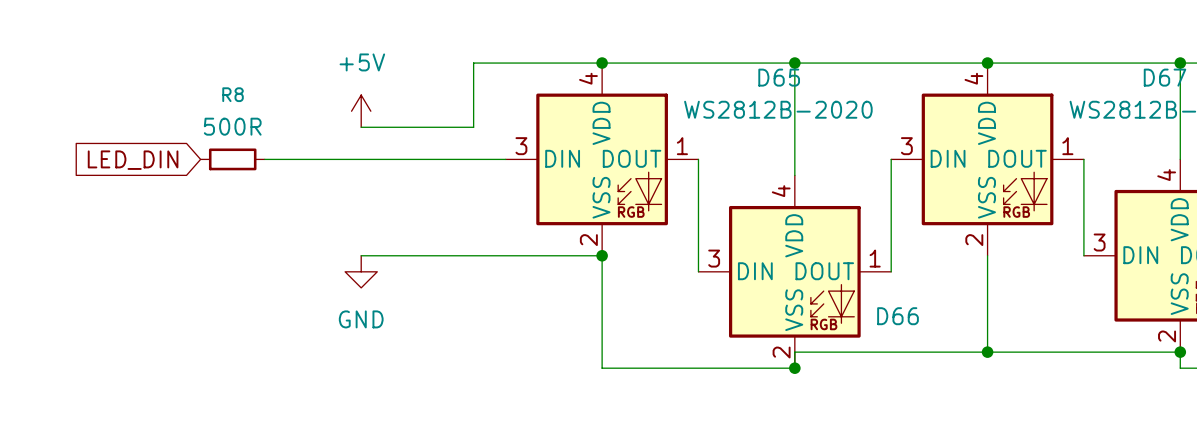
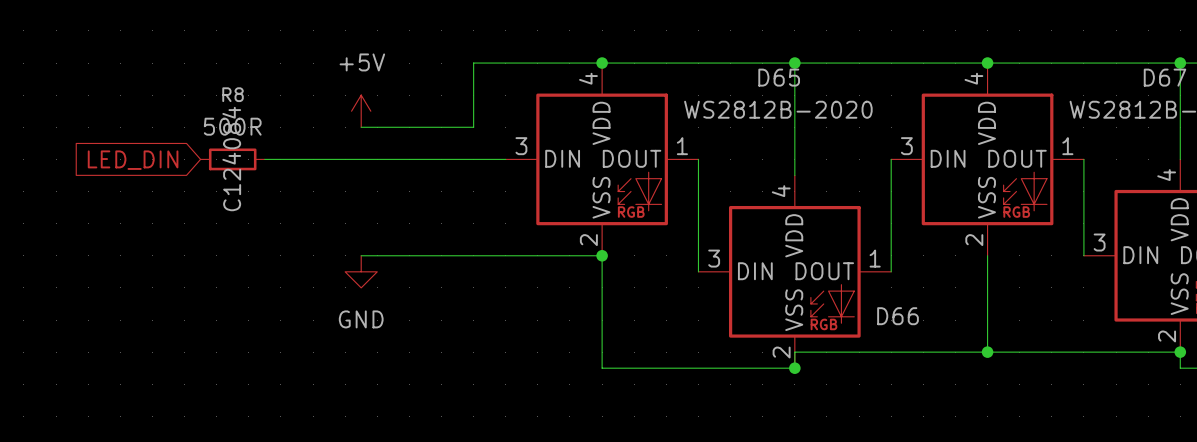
R8 text: none -> C124084 (231, 159)

